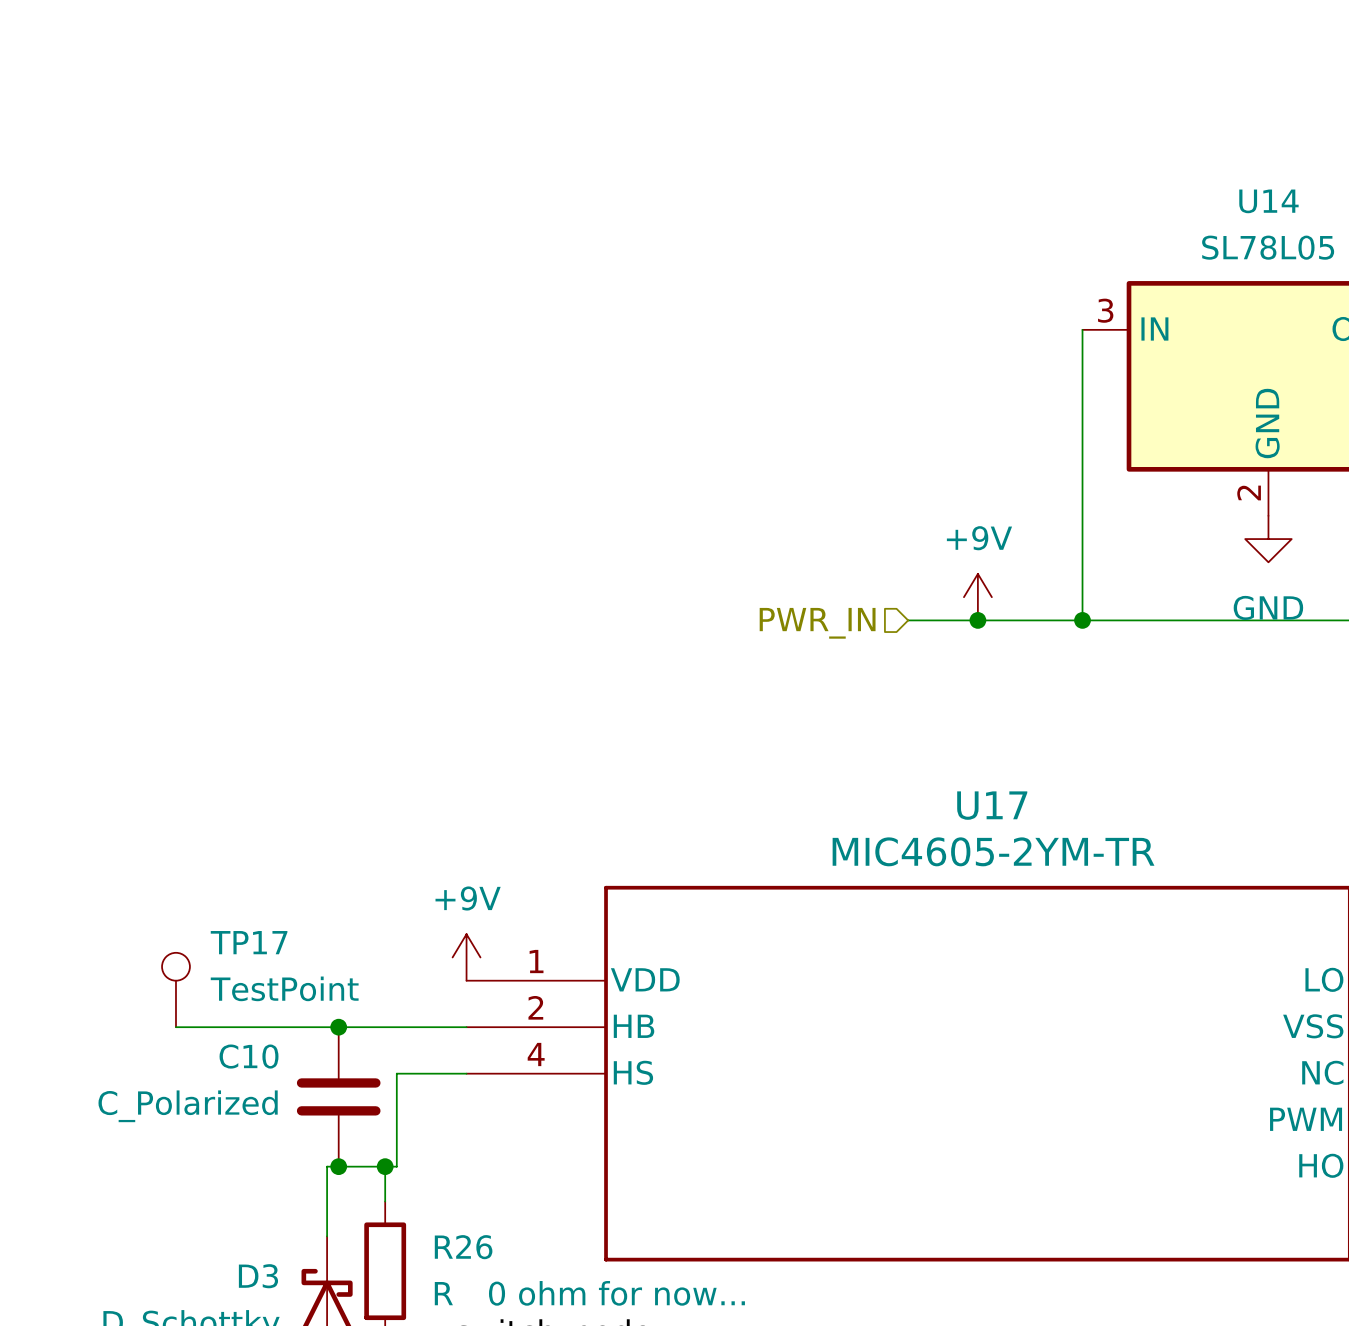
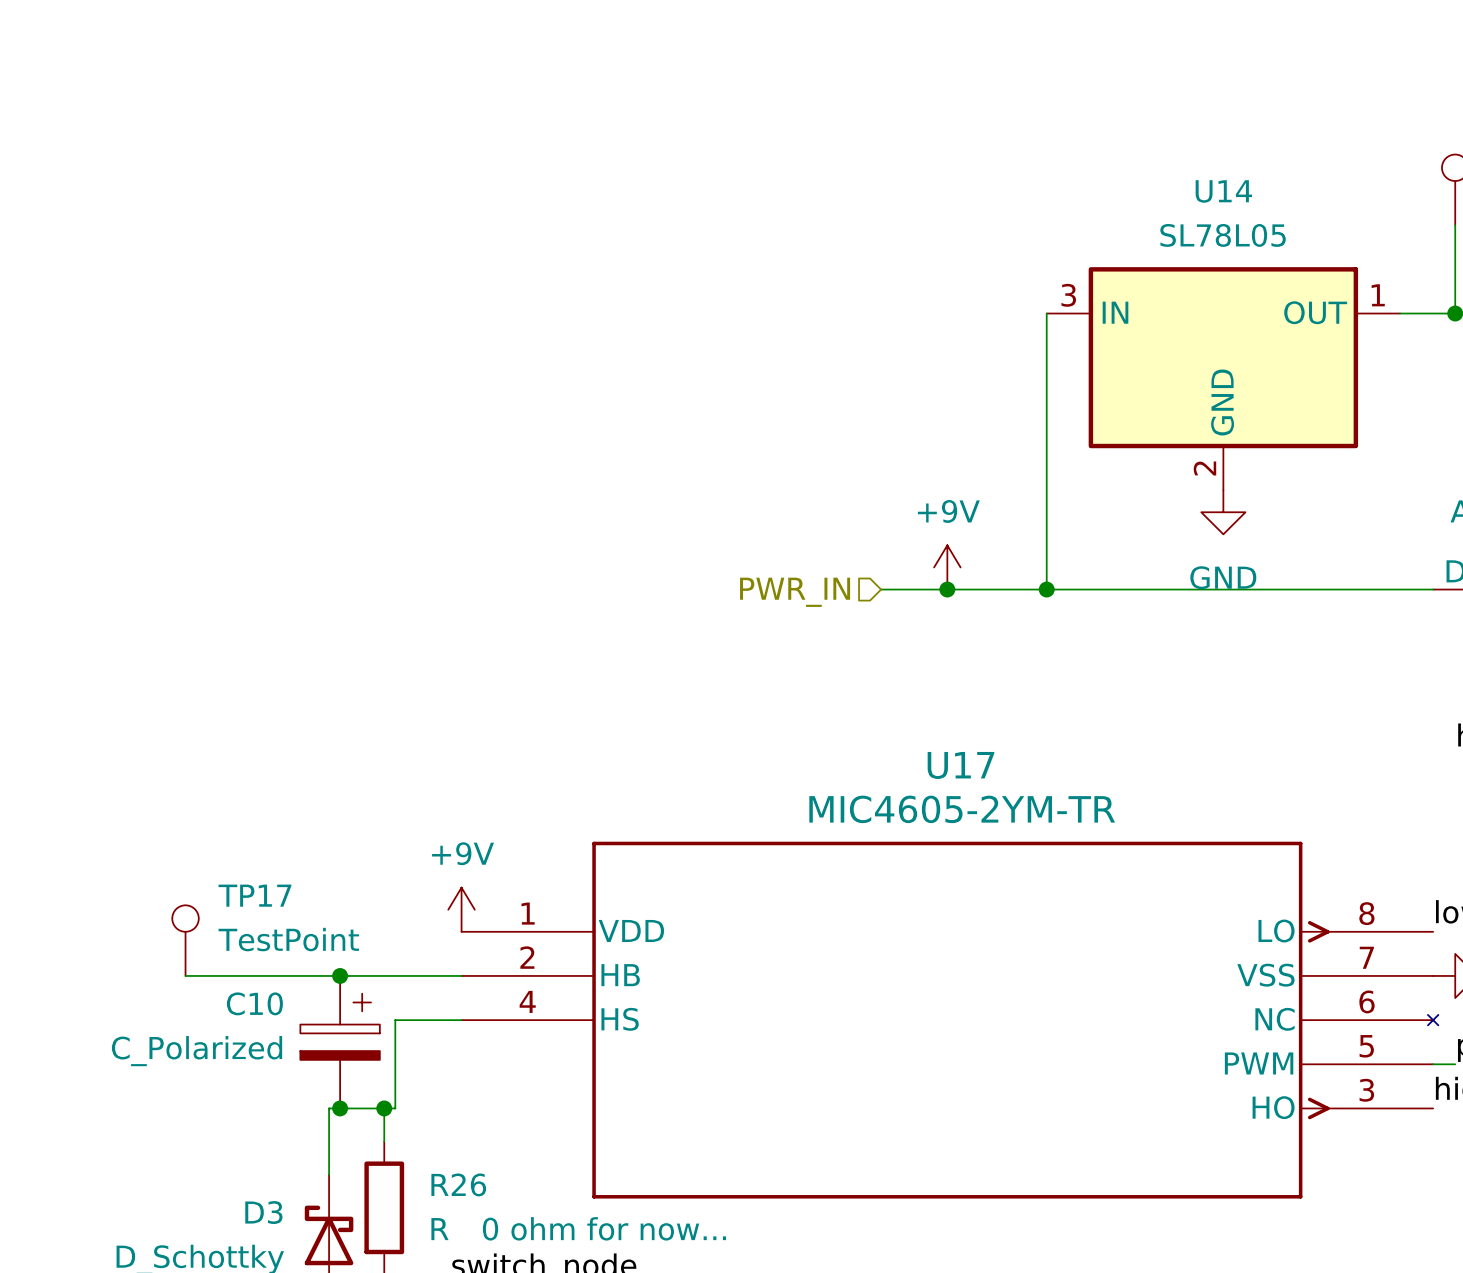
C10 symbol: [296, 1027, 381, 1167] -> [300, 975, 380, 1109]

